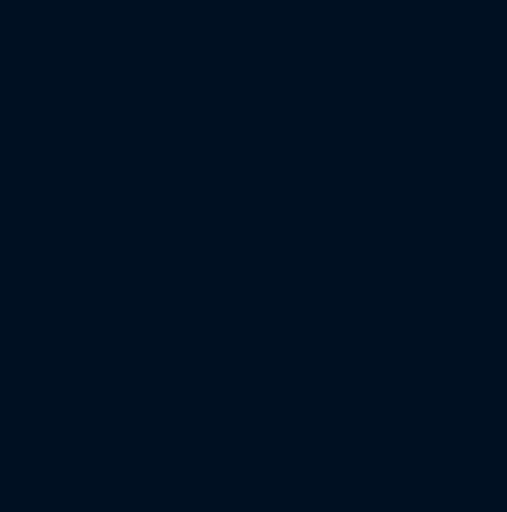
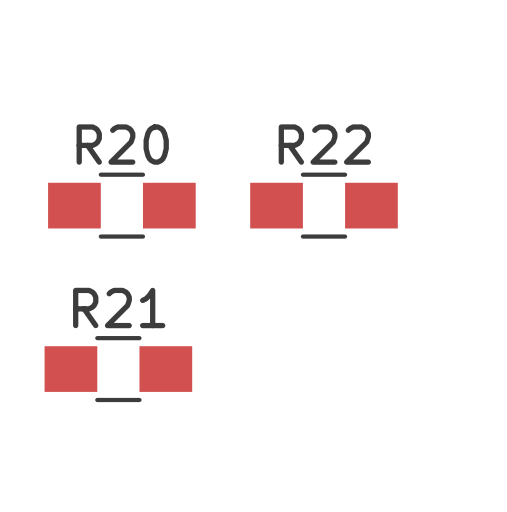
R20: none -> (121, 205)
R22: none -> (323, 205)
R21: none -> (118, 369)

